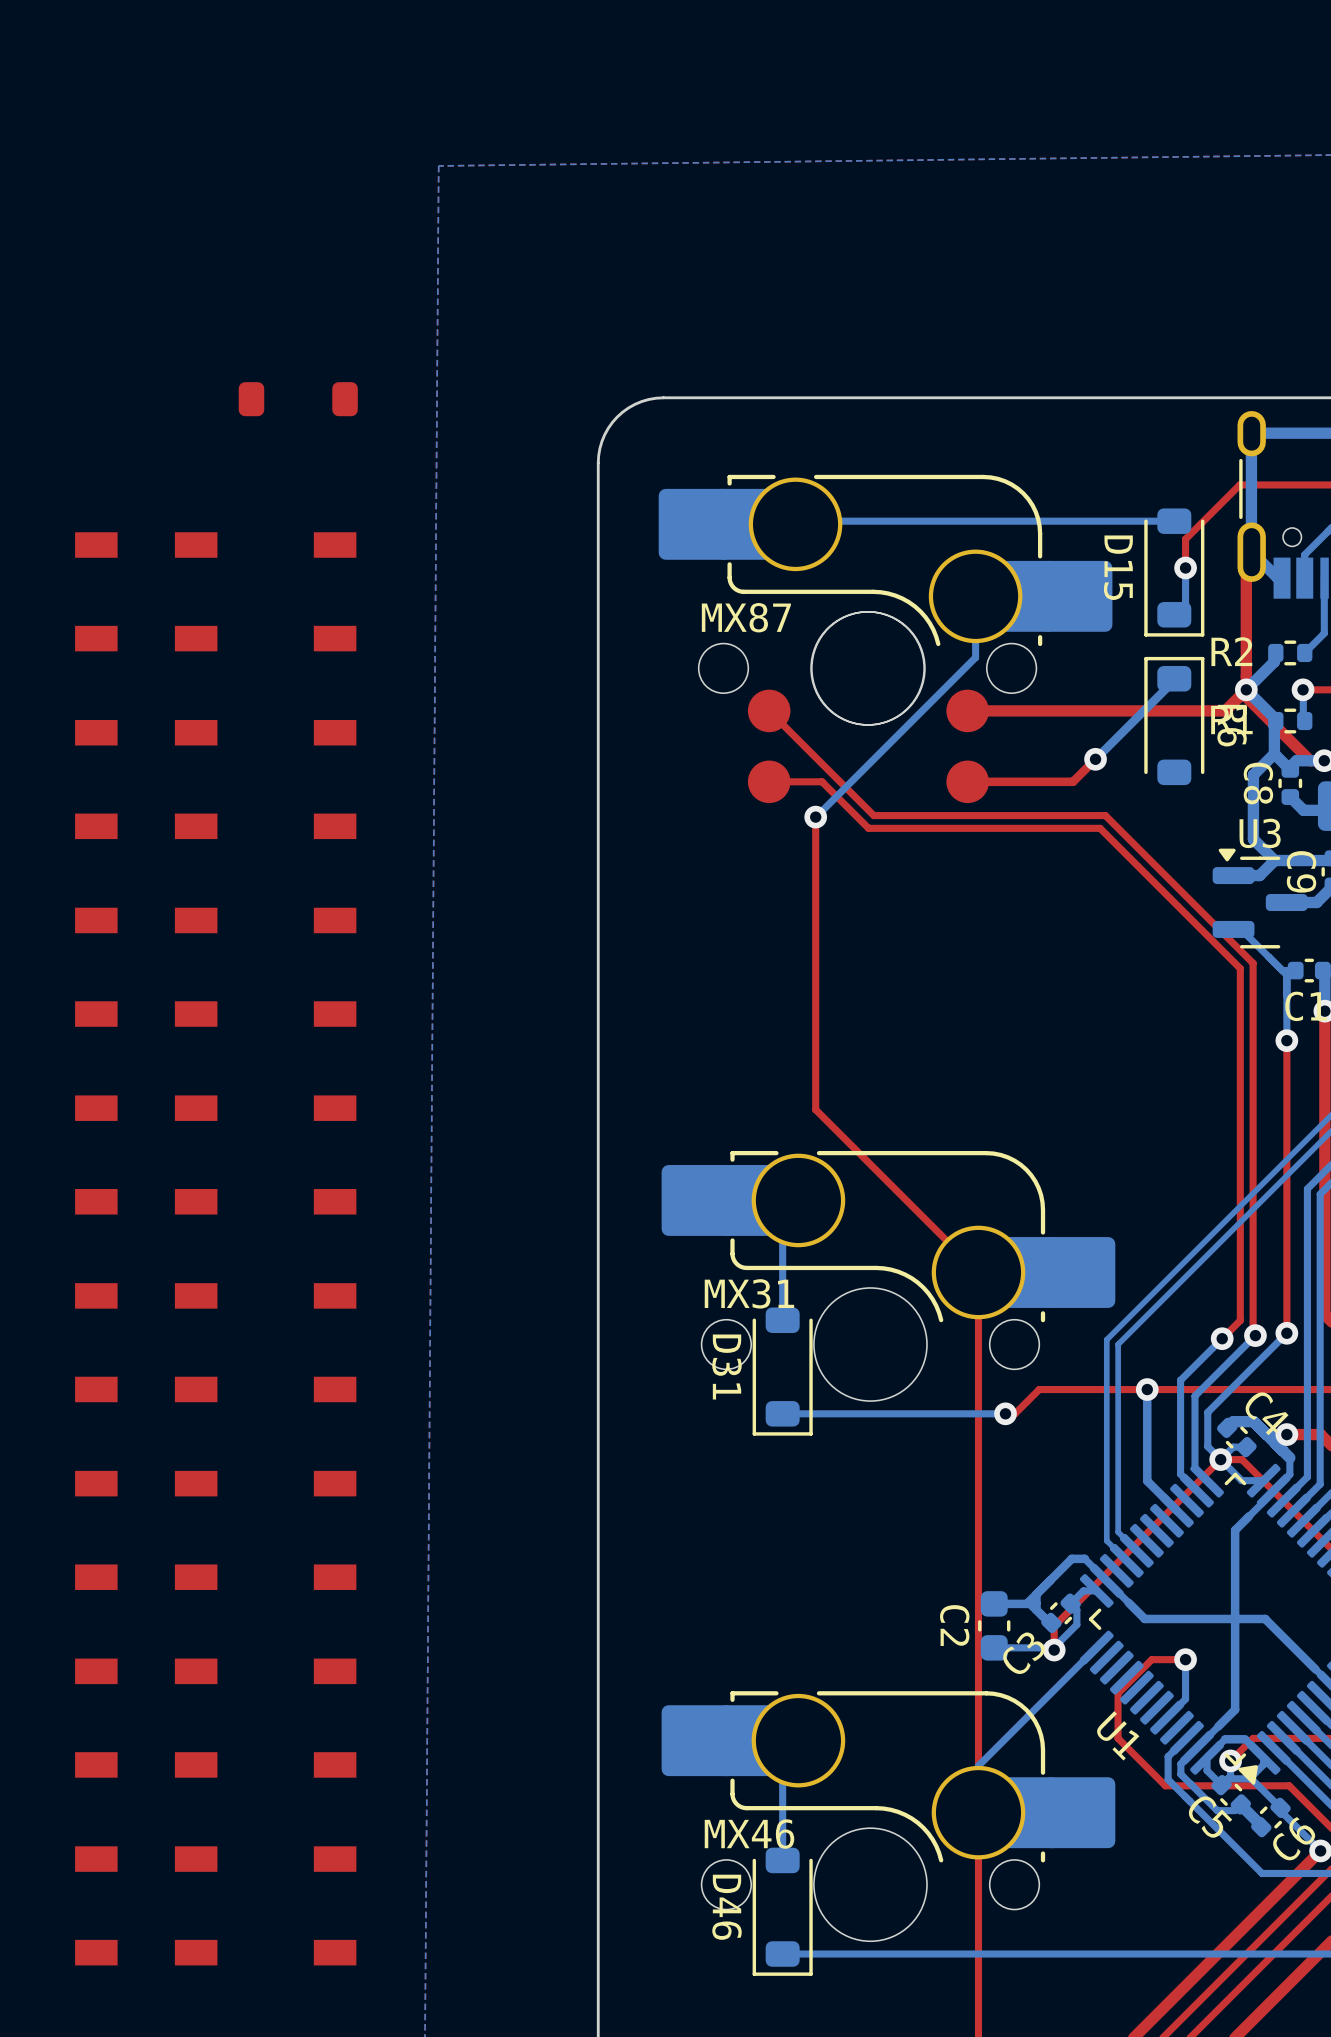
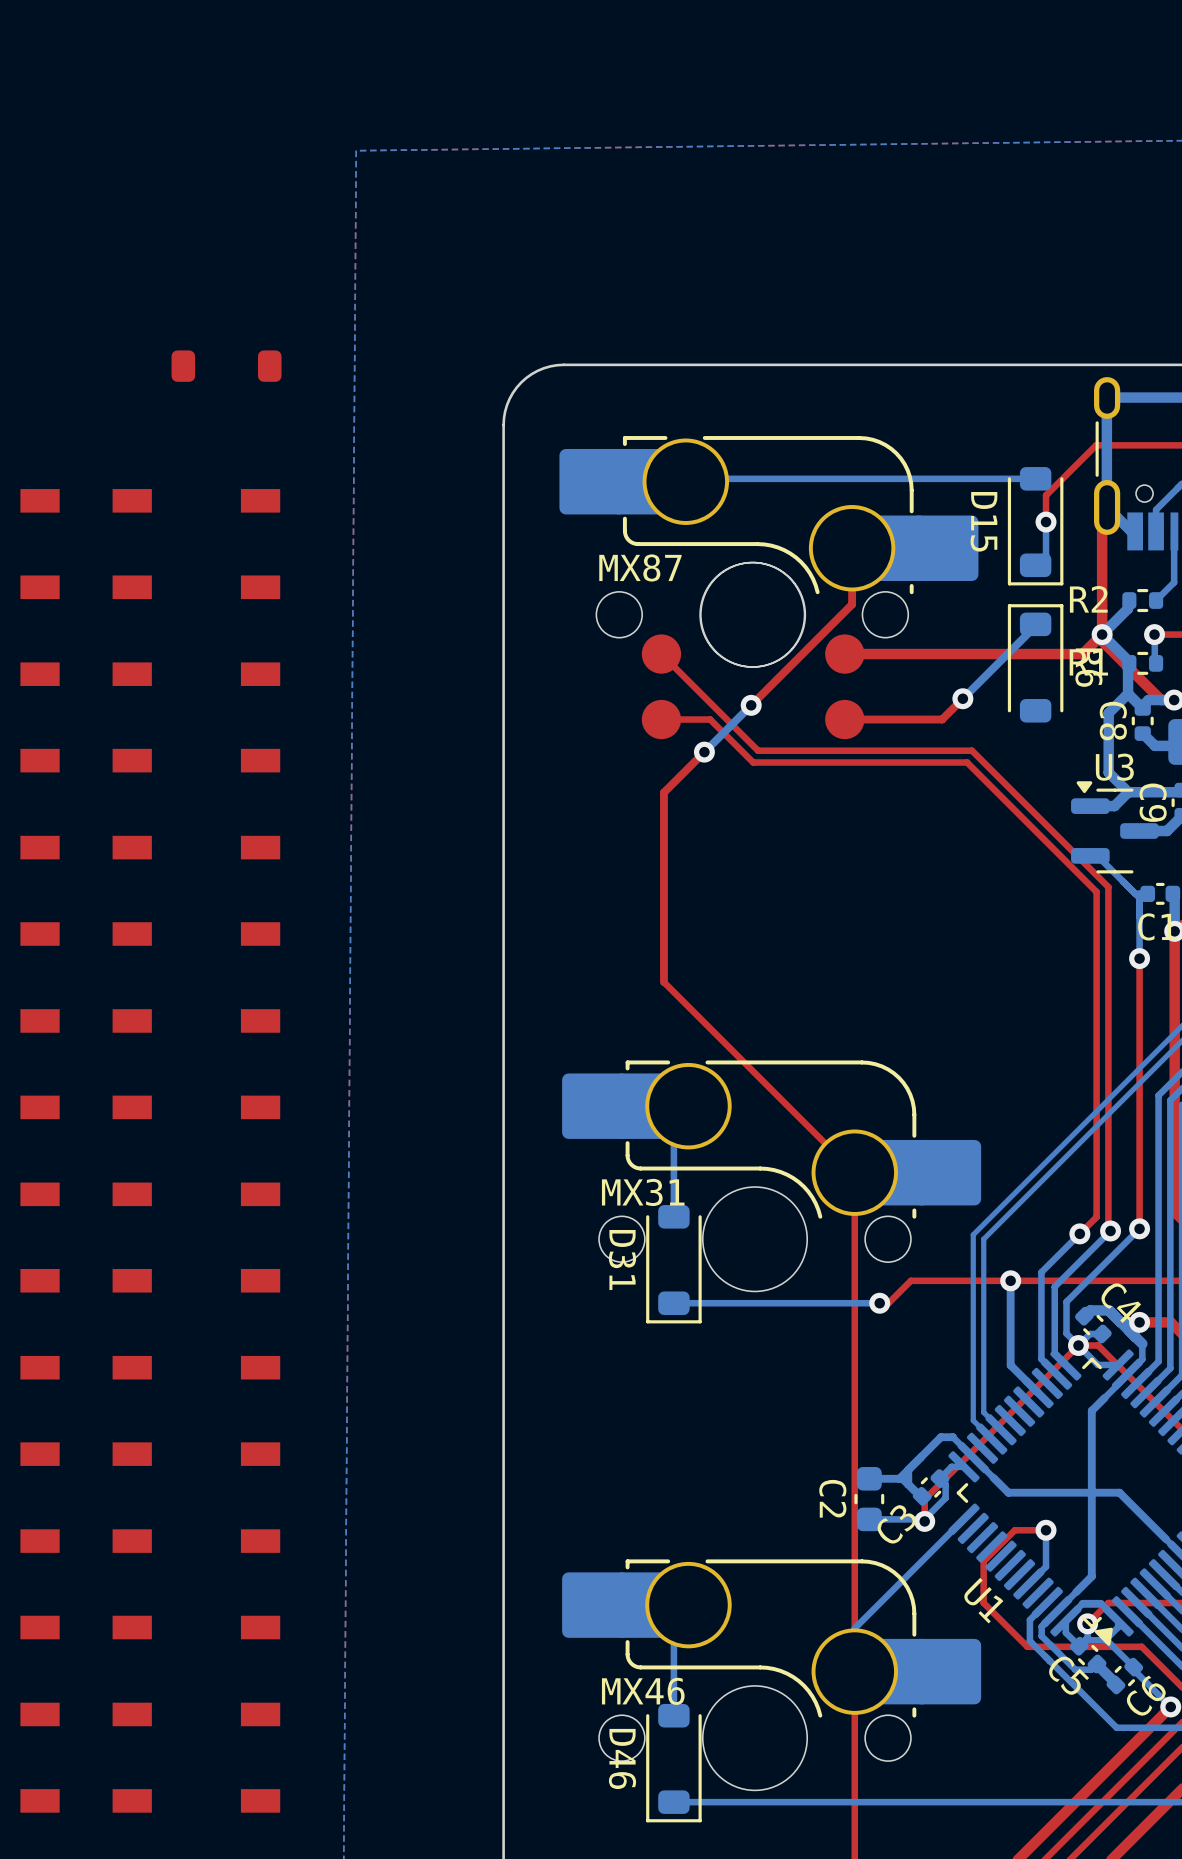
bottom track: (975, 596) (975, 657) (816, 817) -> (751, 705) (704, 752)
top track: none -> (852, 548) (852, 604) (751, 705)
via: none -> (751, 705)
top track: (815, 817) (815, 1109) (978, 1272) -> (704, 752) (663, 792) (663, 982) (854, 1172)

